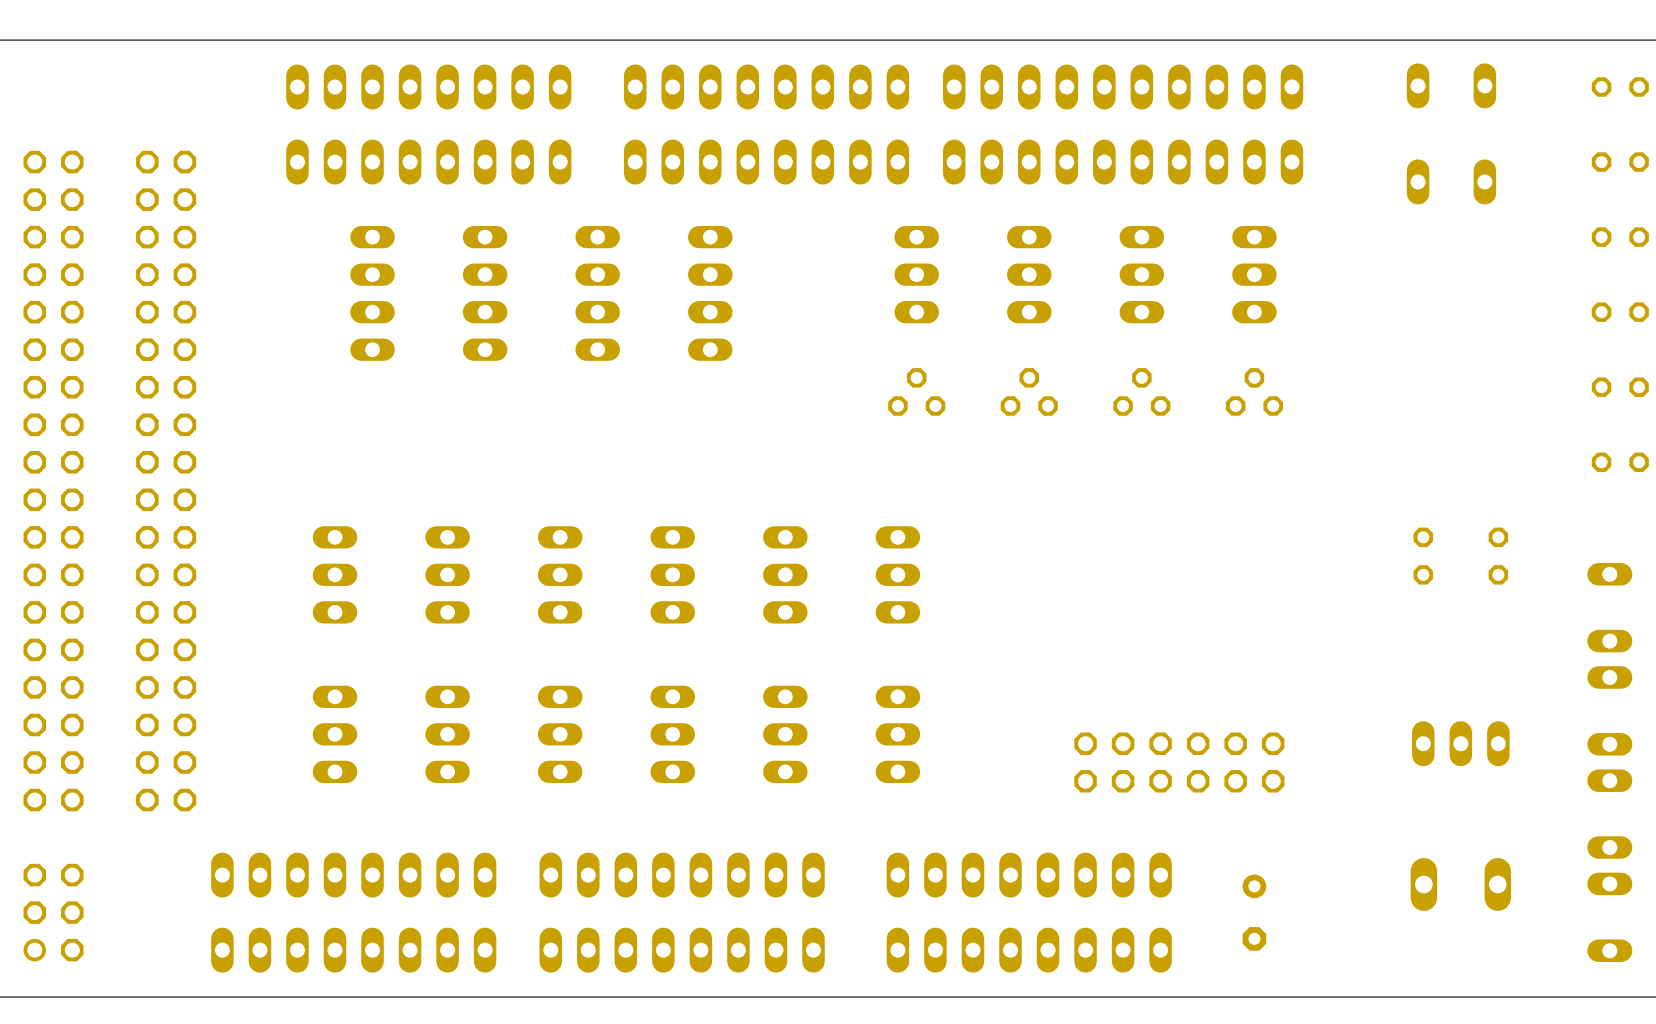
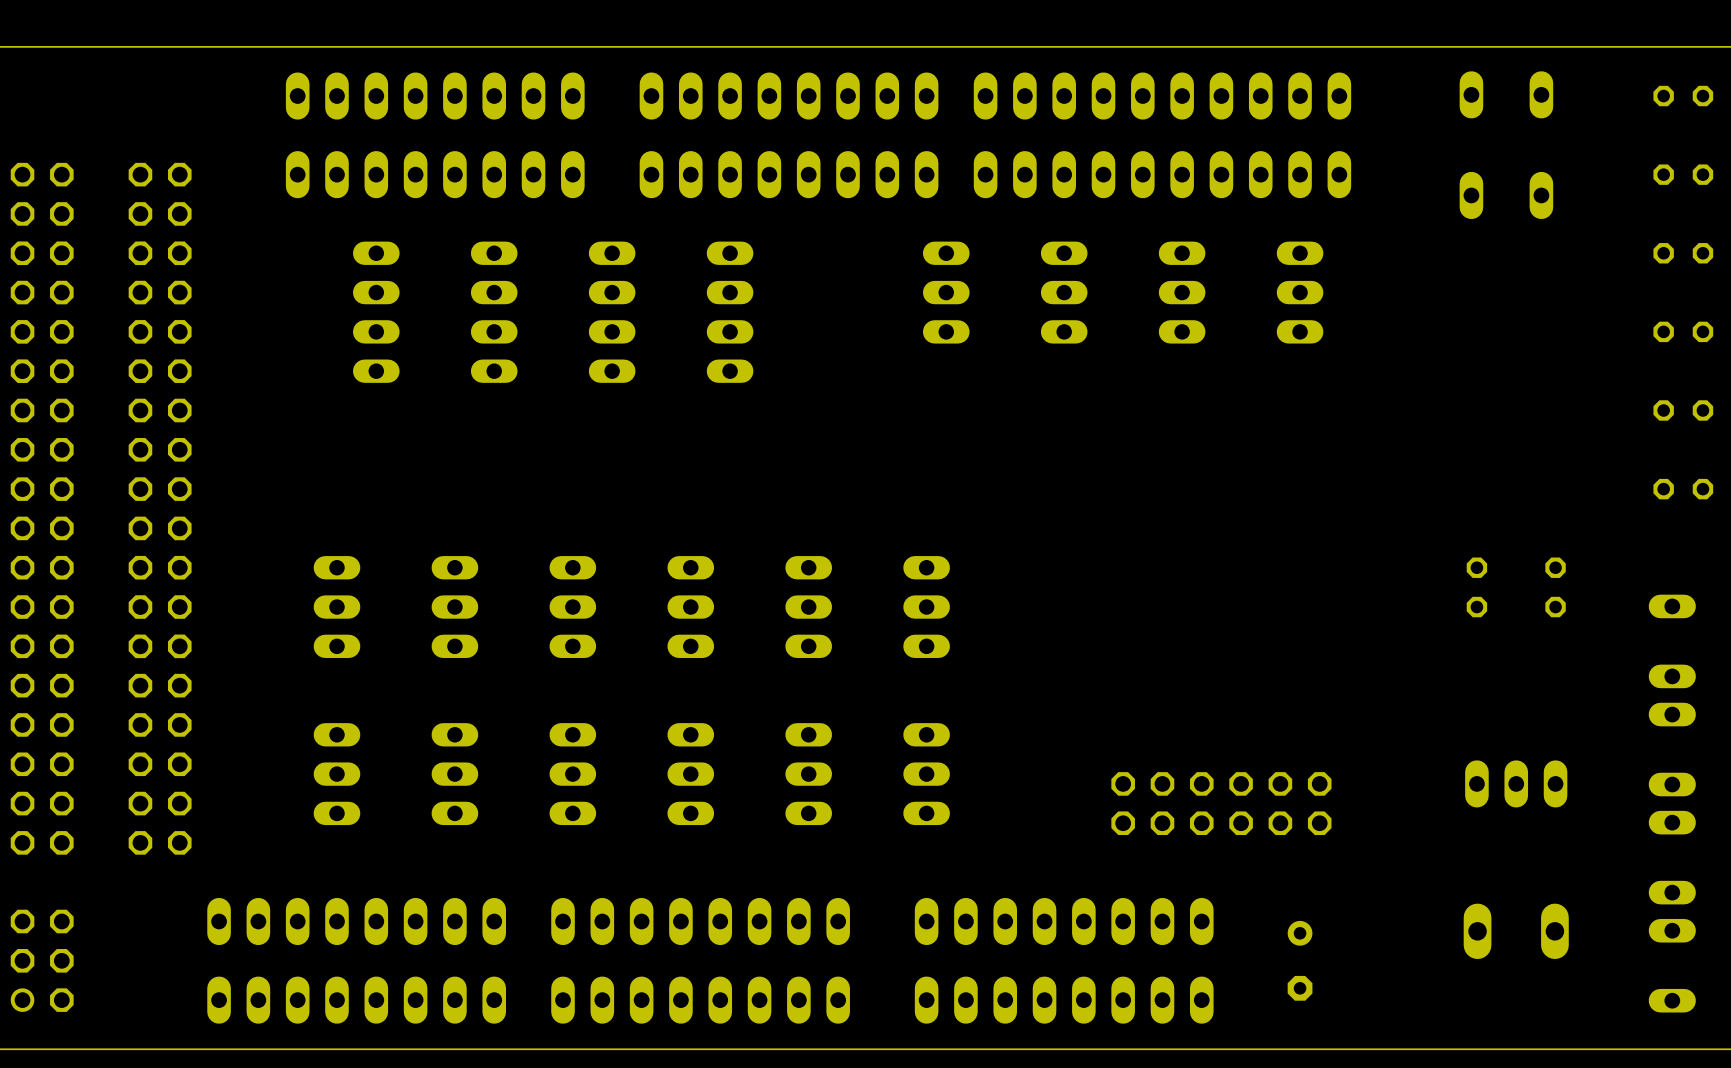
part: (916, 391) -> none
part: (1029, 391) -> none
part: (1141, 391) -> none
part: (1254, 391) -> none

